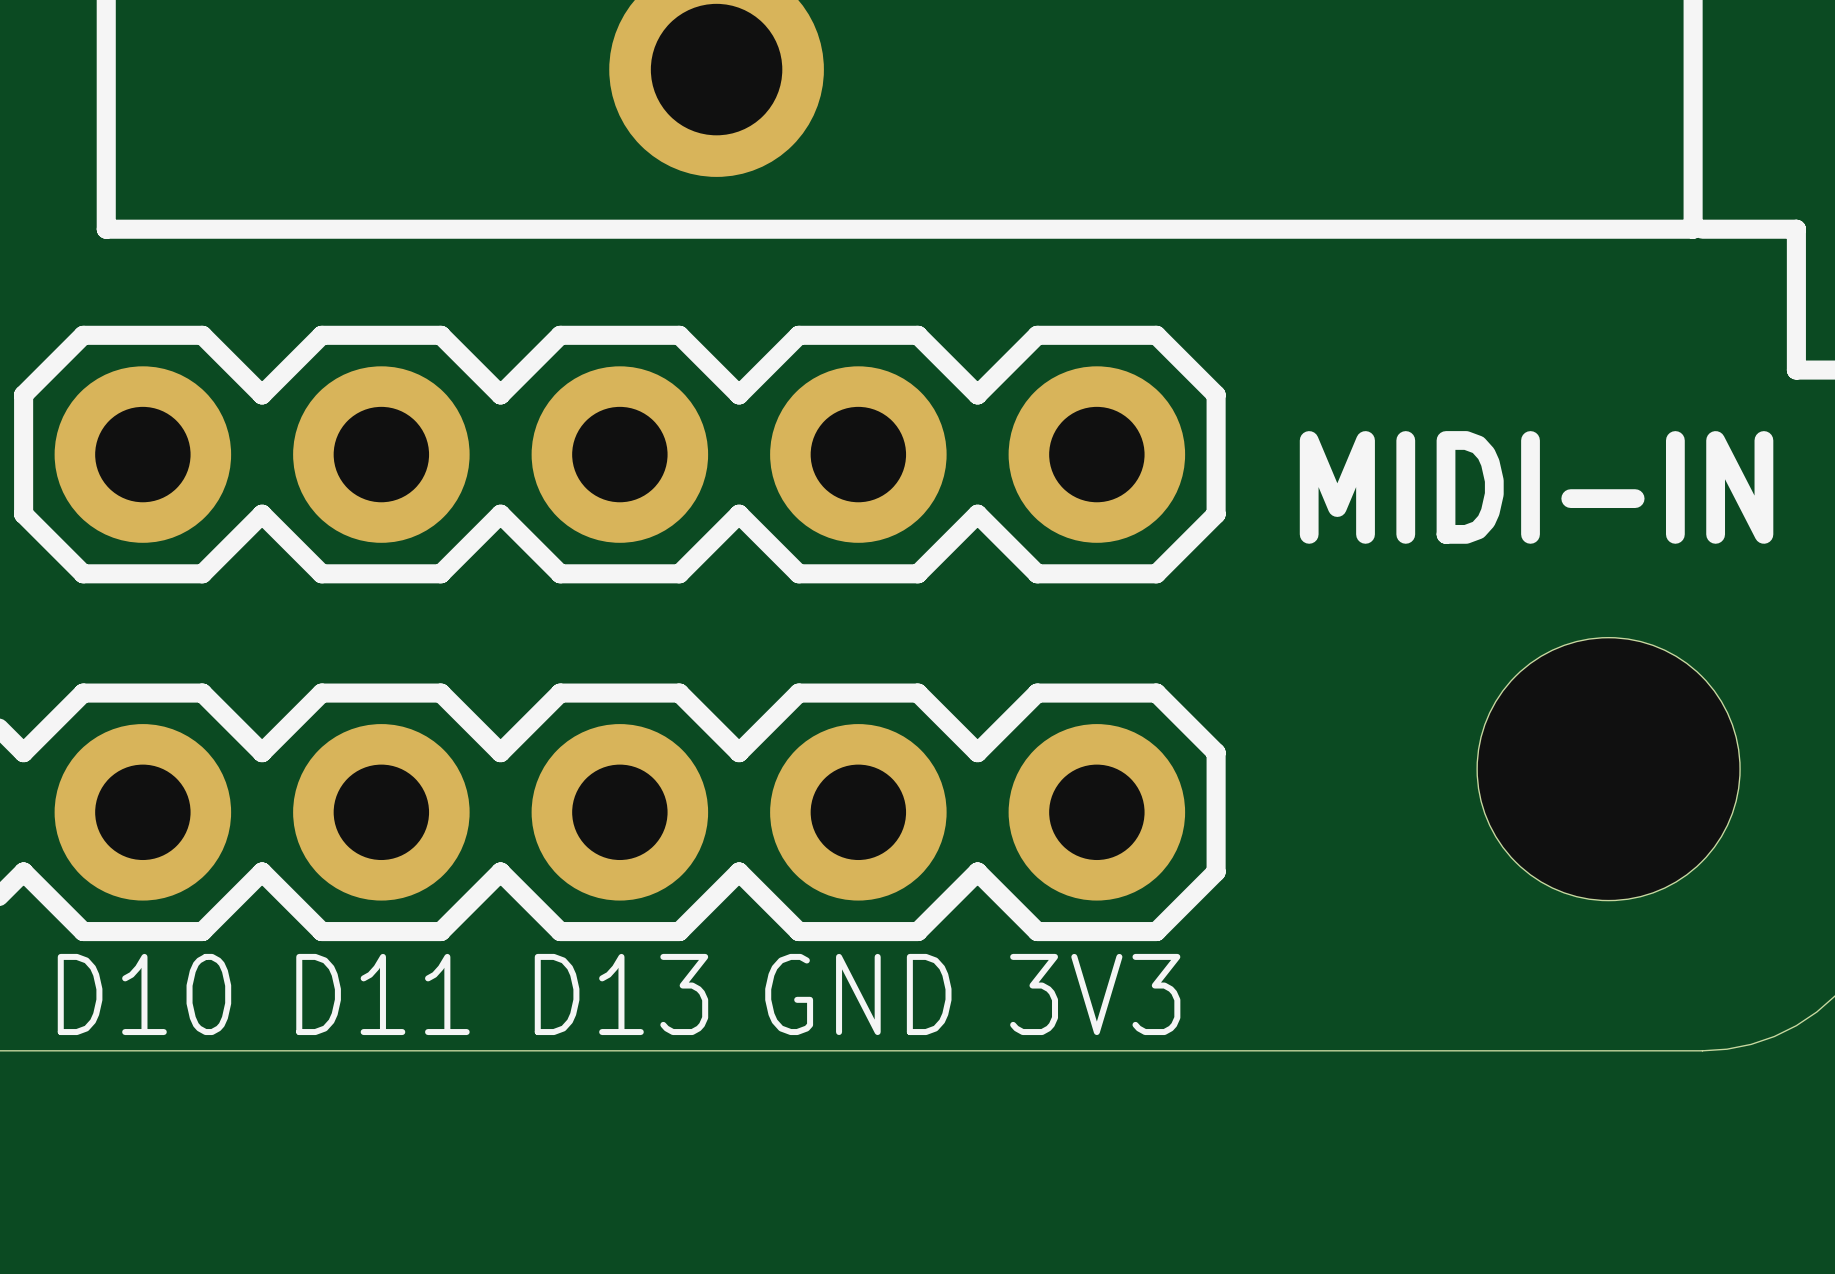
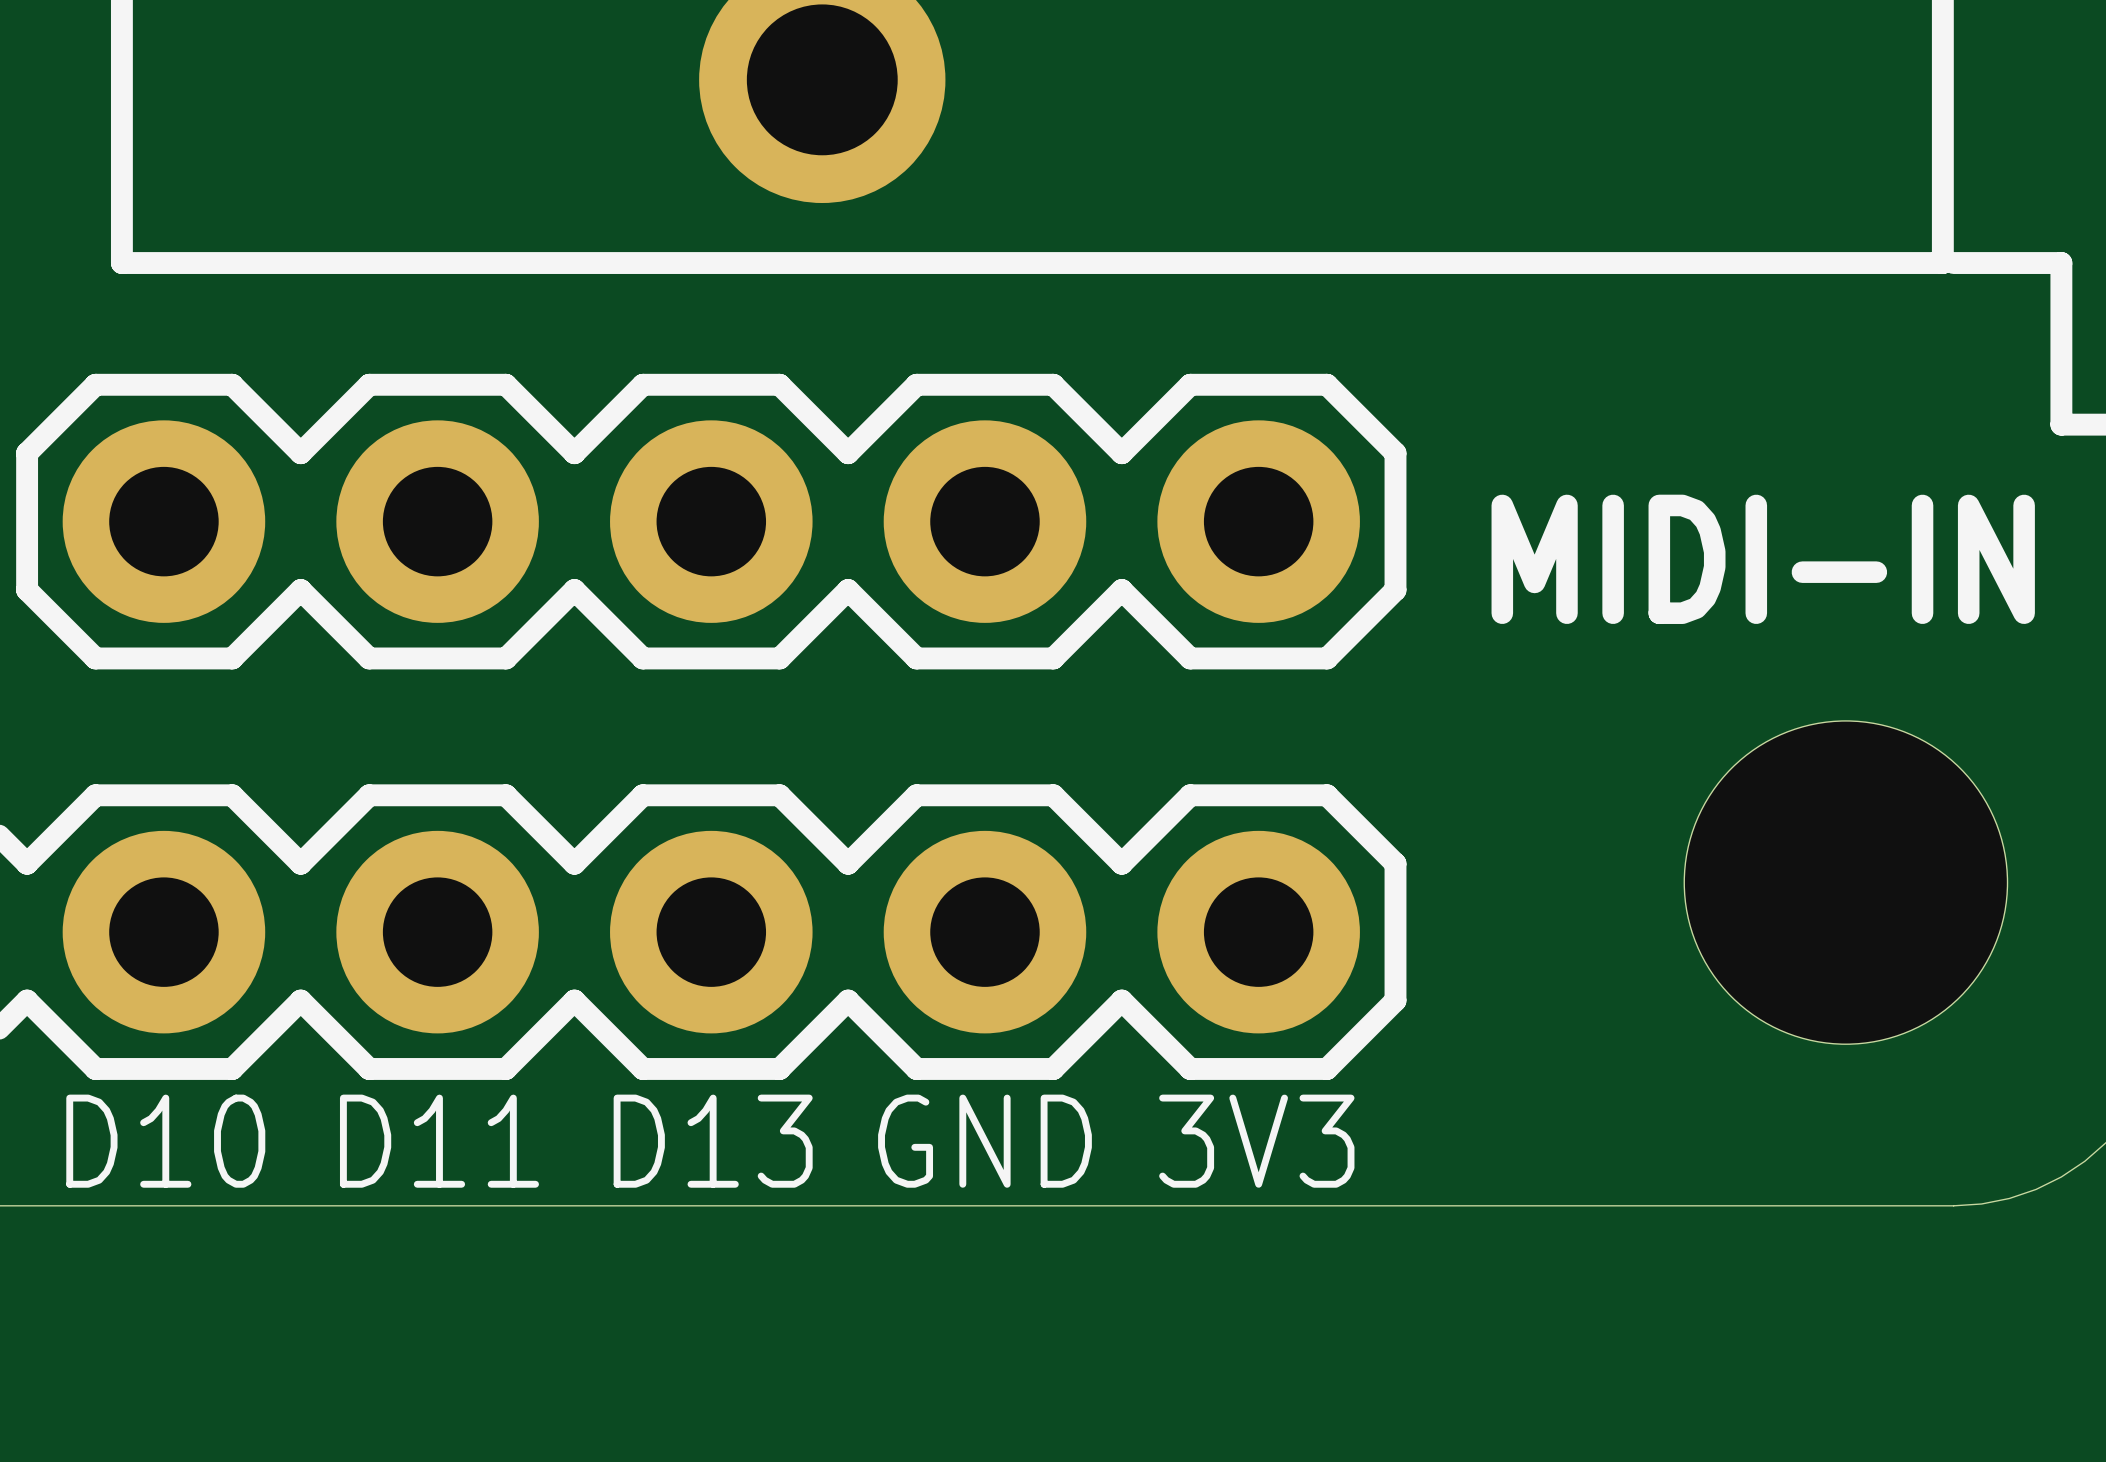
hole size: [1477, 637, 1741, 901] -> [1684, 720, 2008, 1045]

